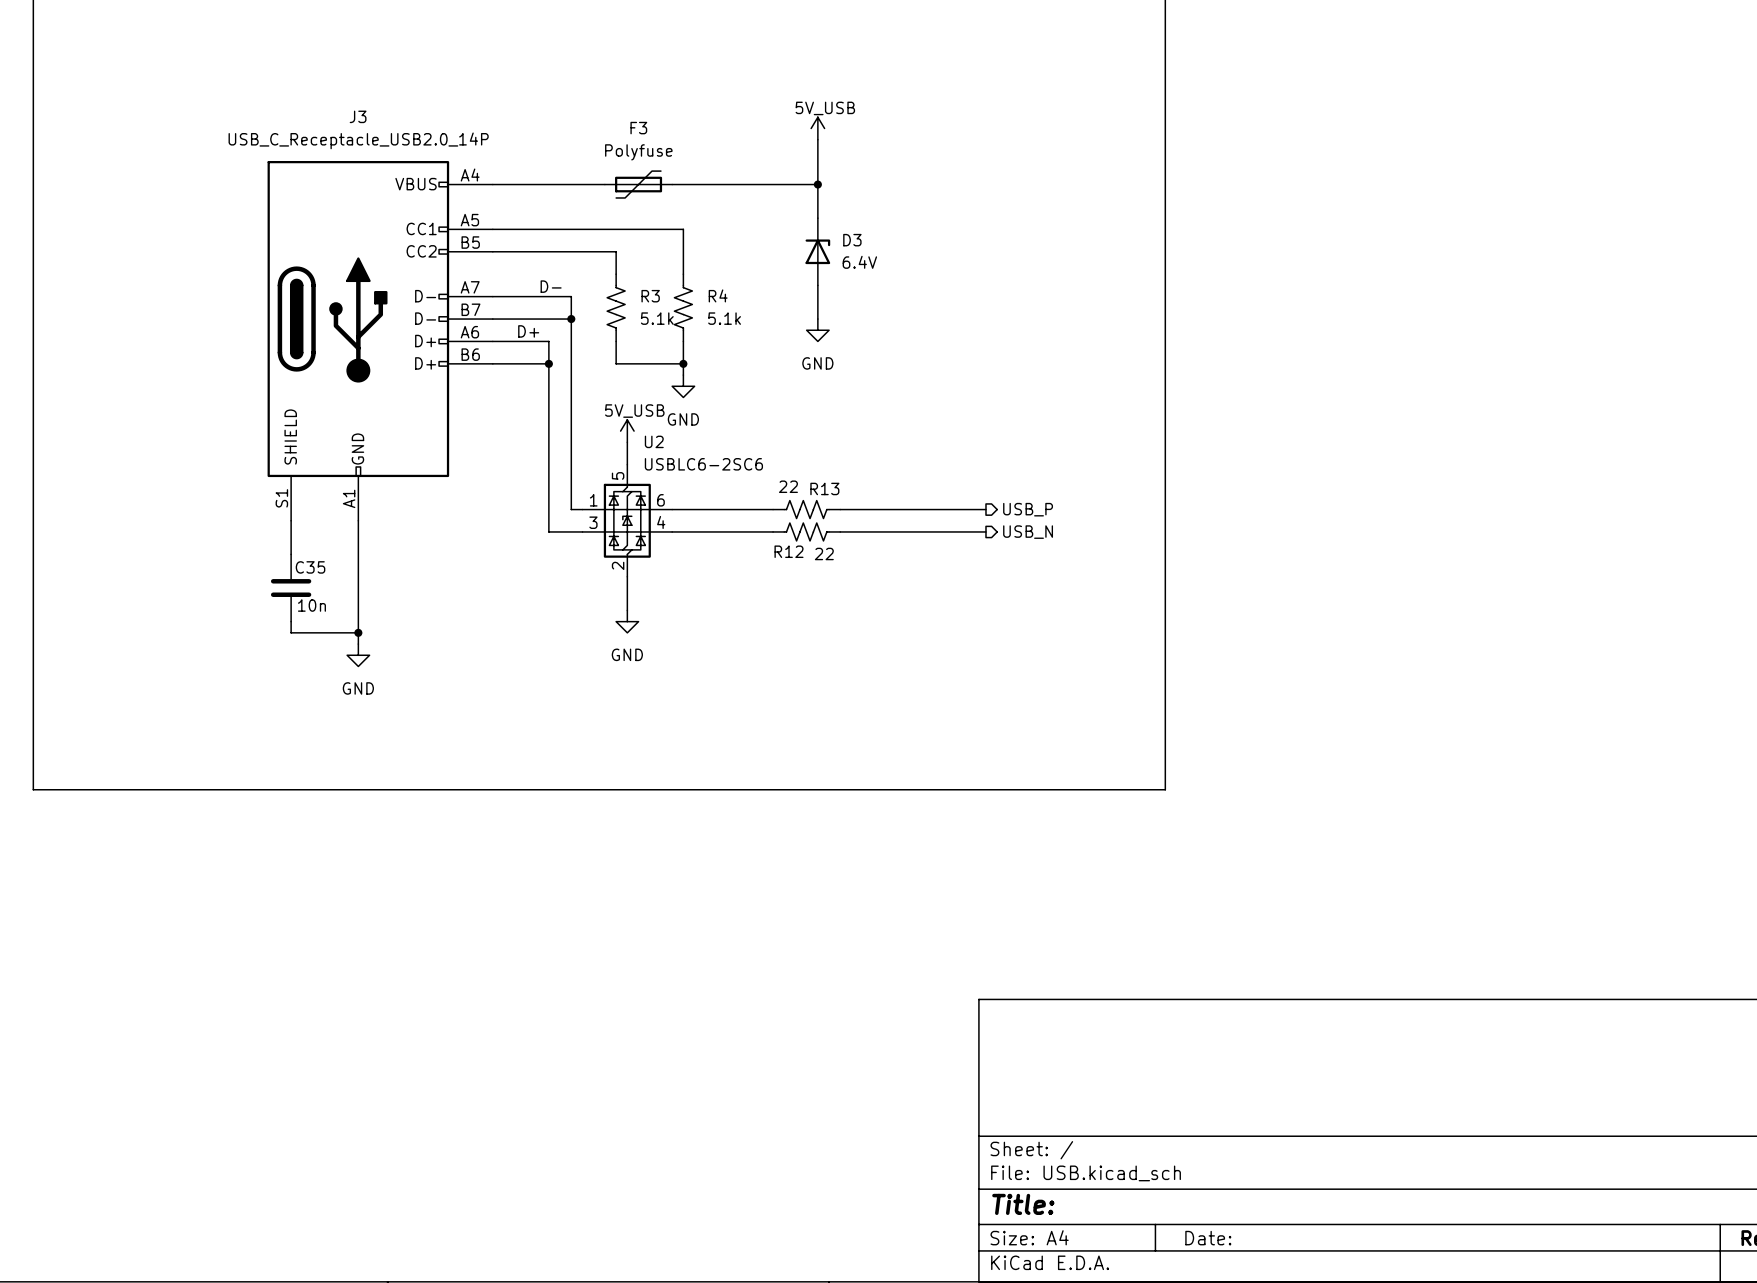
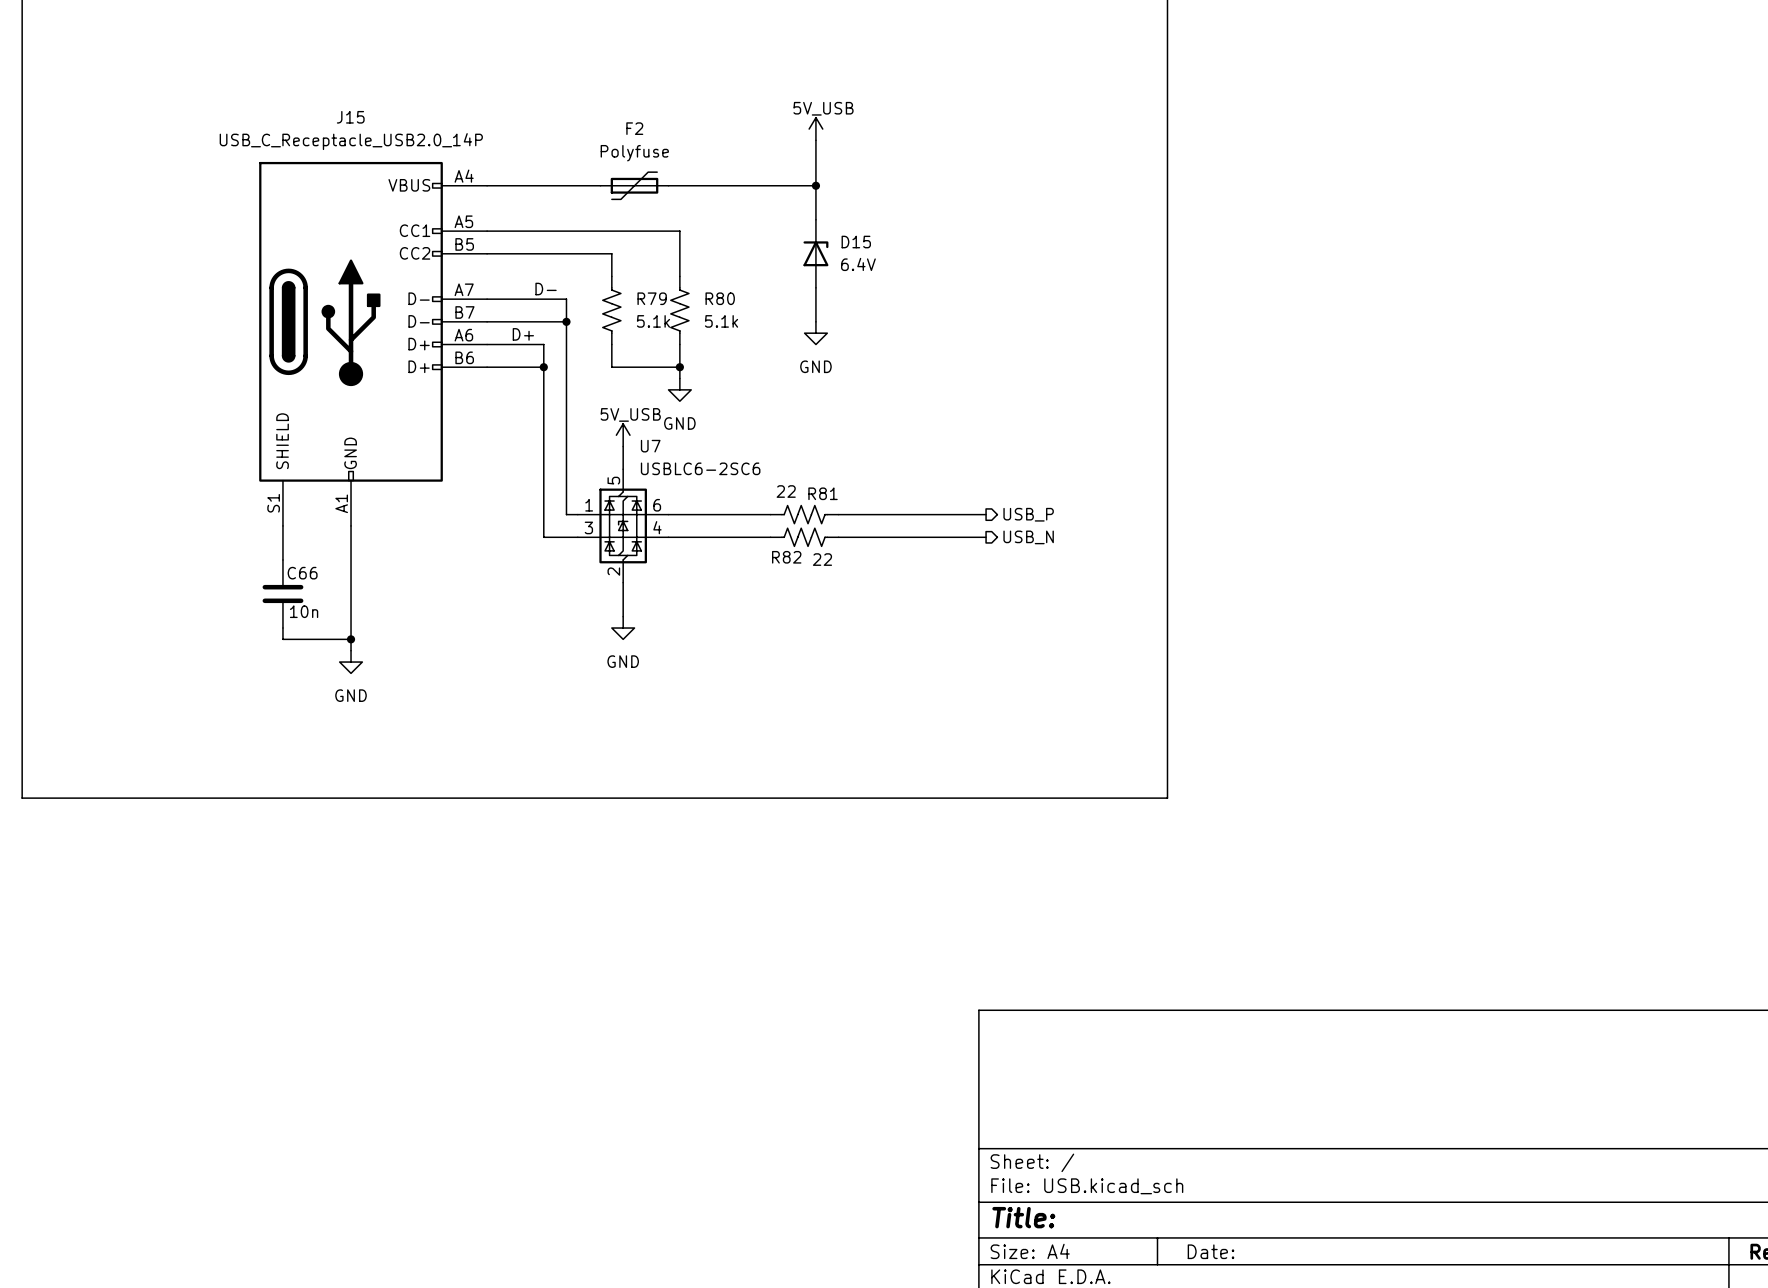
J3 name: J3 (358, 116) -> J15 (350, 117)
F3 name: F3 (638, 128) -> F2 (634, 128)
D3 name: D3 (852, 240) -> D15 (856, 242)
R4 name: R4 (718, 295) -> R80 (720, 298)
R3 name: R3 (650, 296) -> R79 (652, 298)
U2 name: U2 (654, 441) -> U7 (650, 446)
R13 name: R13 (824, 488) -> R81 (823, 493)
R12 name: R12 (789, 551) -> R82 (786, 557)
C35 name: C35 (310, 567) -> C66 (302, 573)

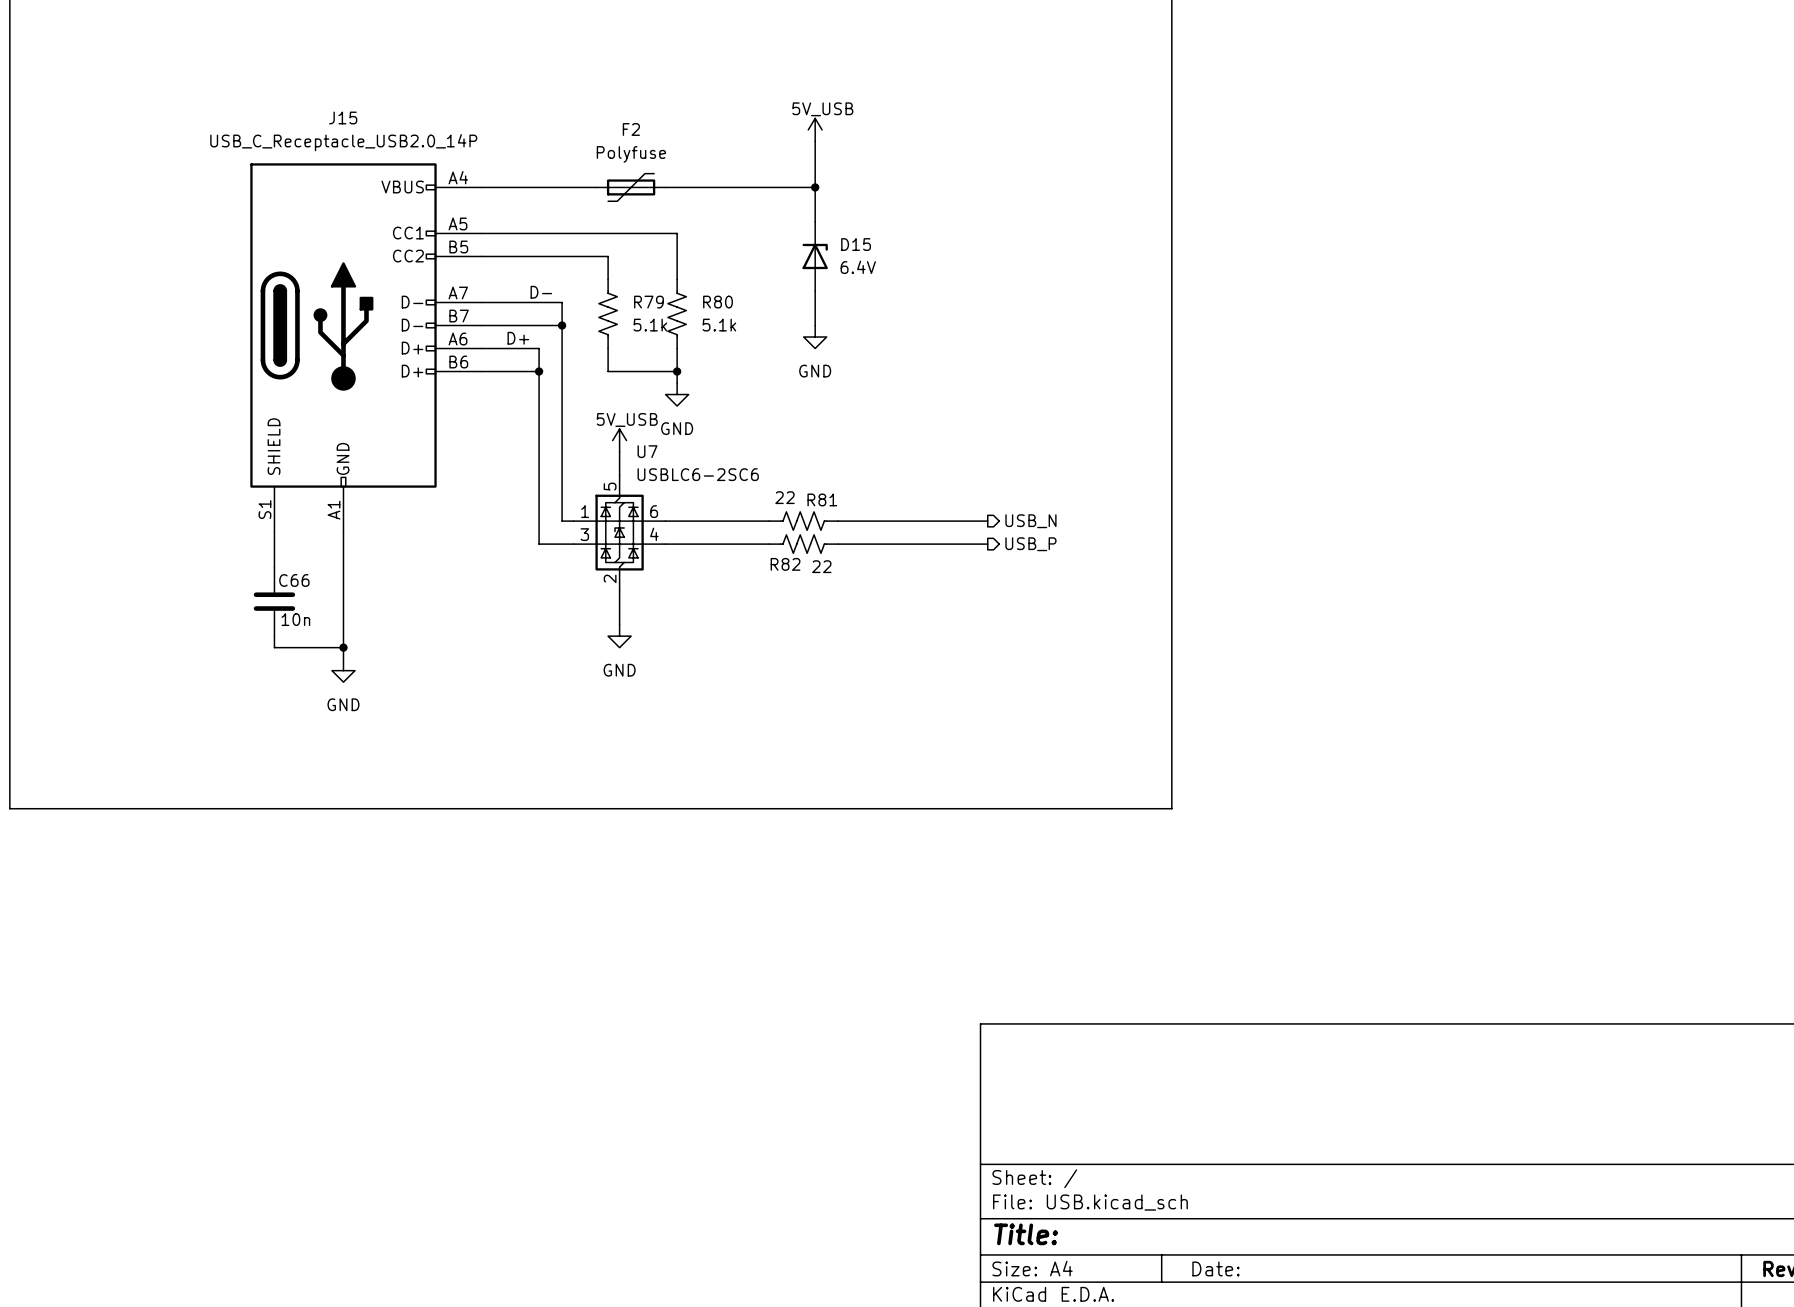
hierarchical label: USB_P (1028, 514) -> USB_N (1030, 521)
hierarchical label: USB_N (1028, 537) -> USB_P (1030, 544)

